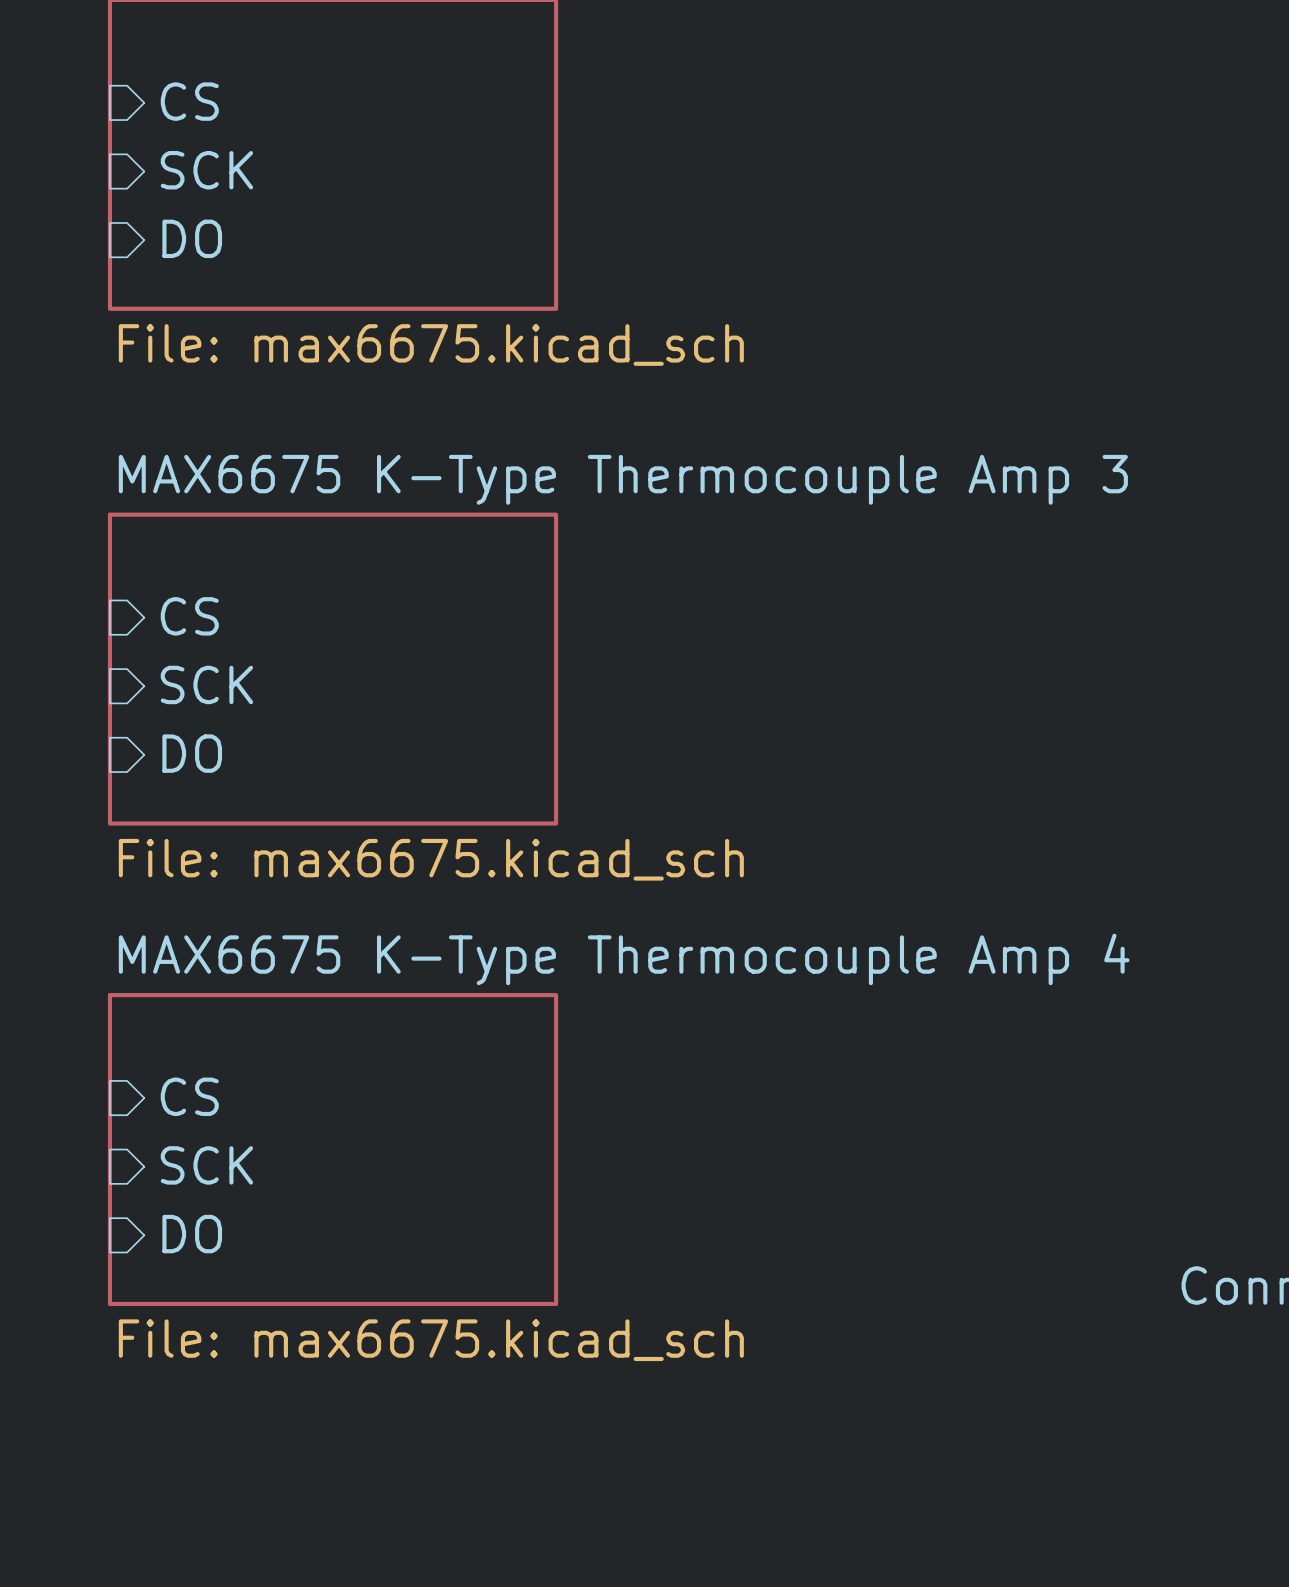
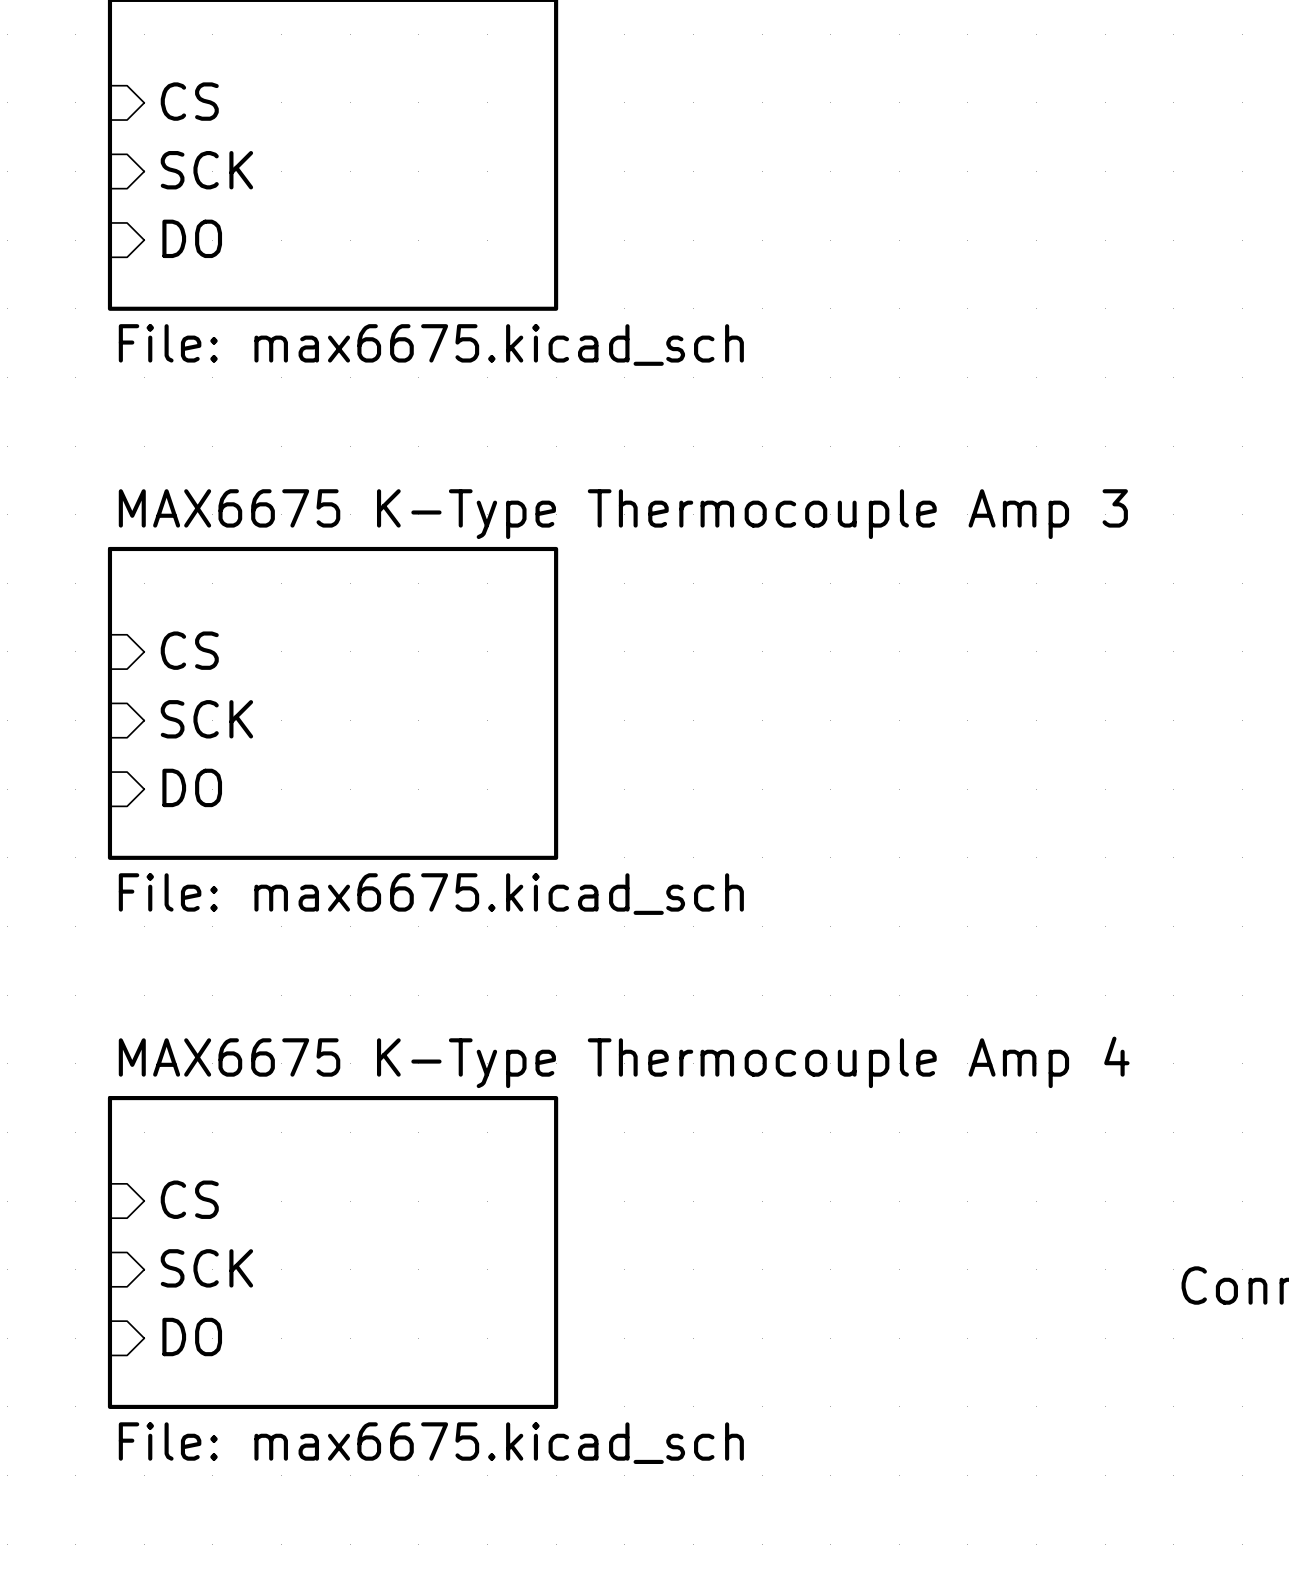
sheet pin position: CS (189, 616) -> CS (189, 650)
sheet MAX6675 K-Type Thermocouple Amp 3 position: (333, 669) -> (333, 703)
sheet pin position: SCK (206, 684) -> SCK (206, 719)
sheet pin position: DO (192, 753) -> DO (192, 787)
sheet pin position: CS (189, 1096) -> CS (189, 1199)
sheet MAX6675 K-Type Thermocouple Amp 4 position: (333, 1149) -> (333, 1252)
sheet pin position: SCK (206, 1165) -> SCK (206, 1268)
sheet pin position: DO (192, 1234) -> DO (192, 1337)

